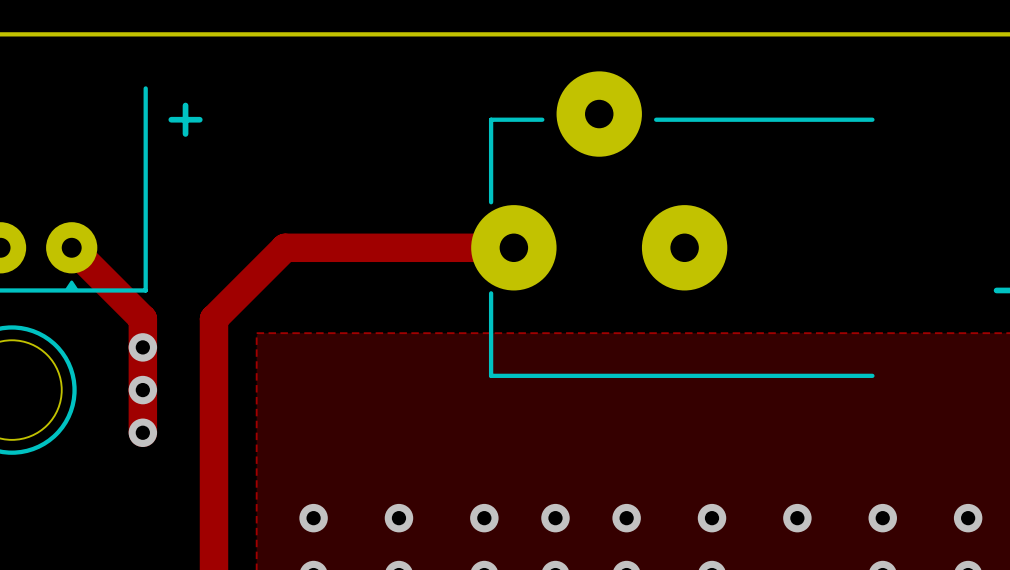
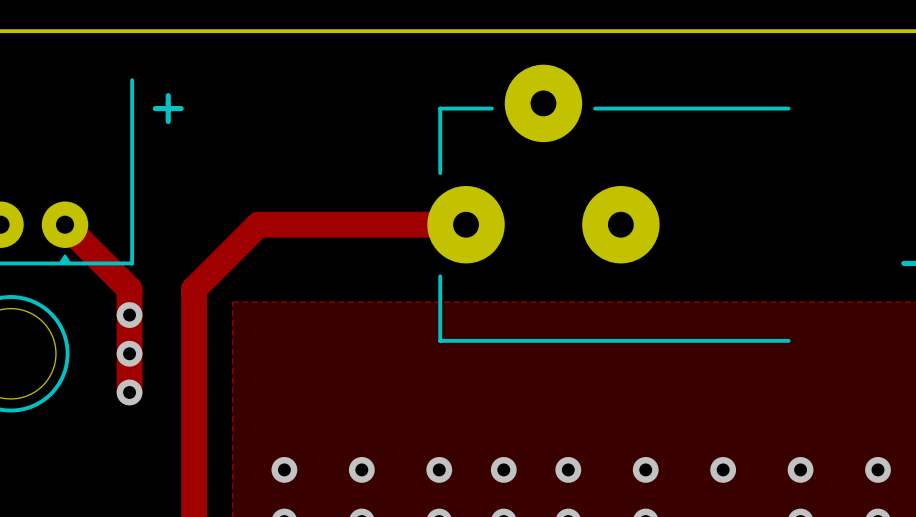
part footprint: [471, 71, 875, 378] -> [427, 64, 791, 343]

